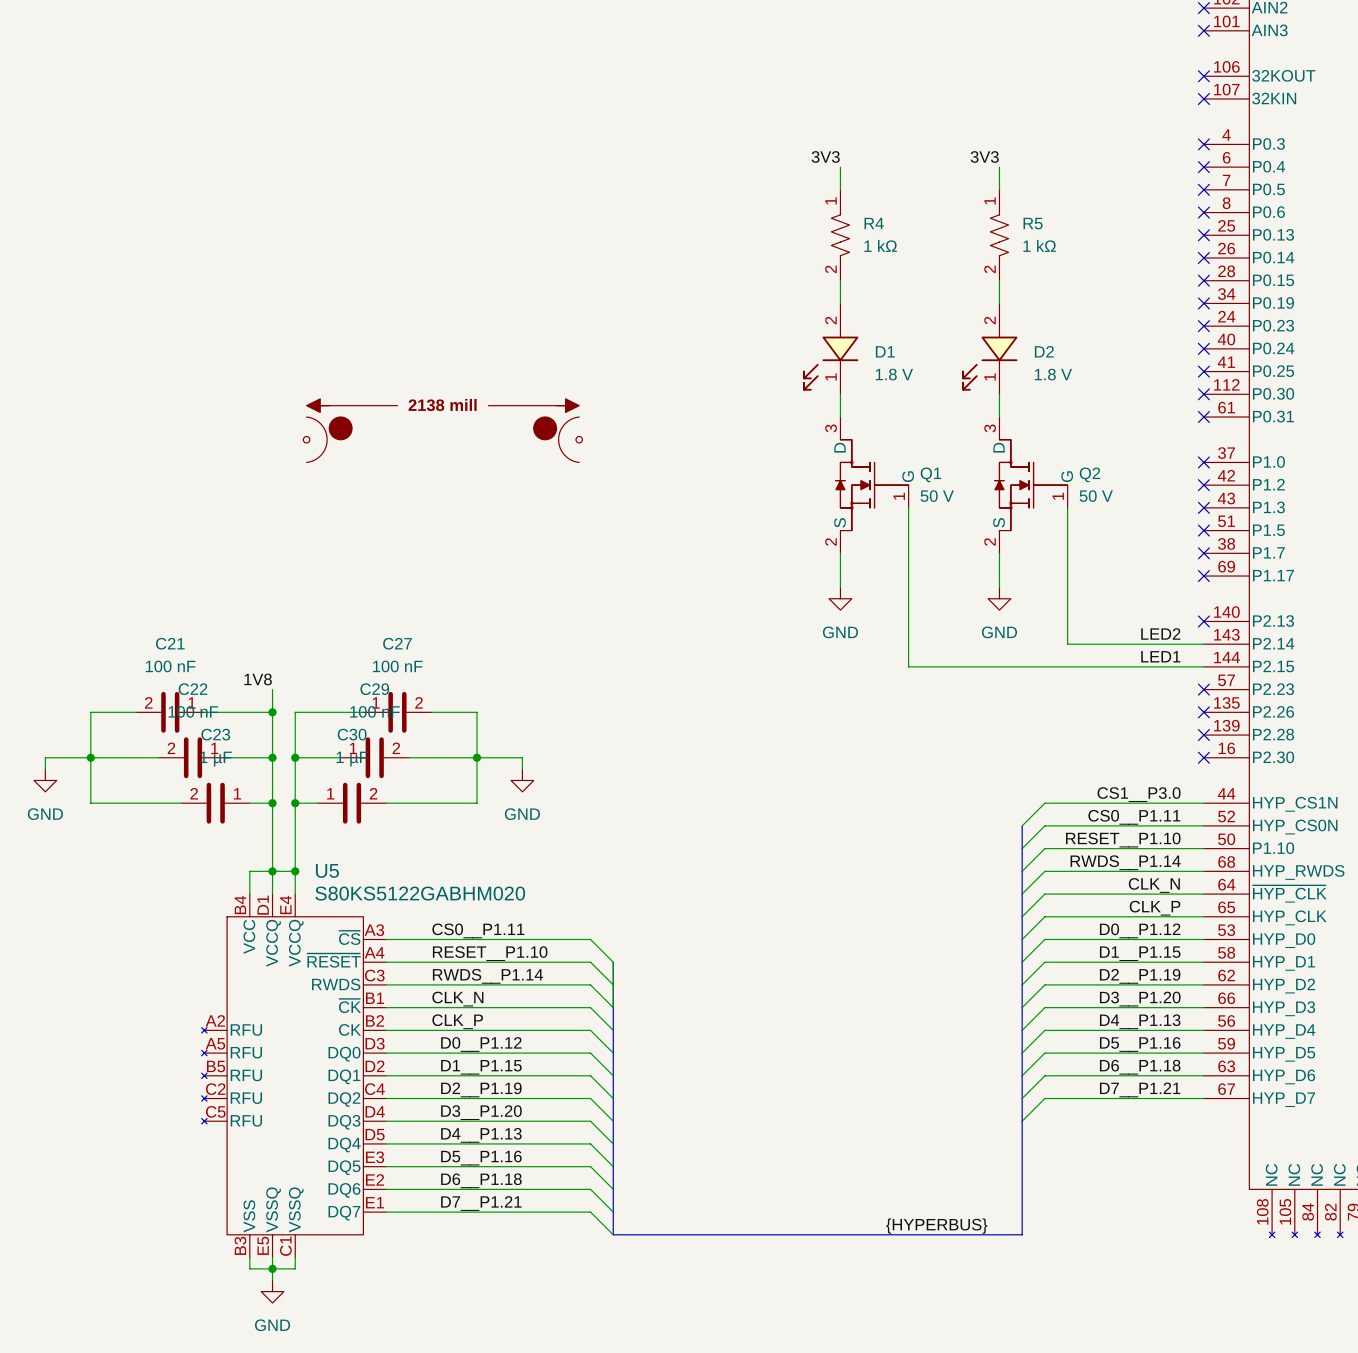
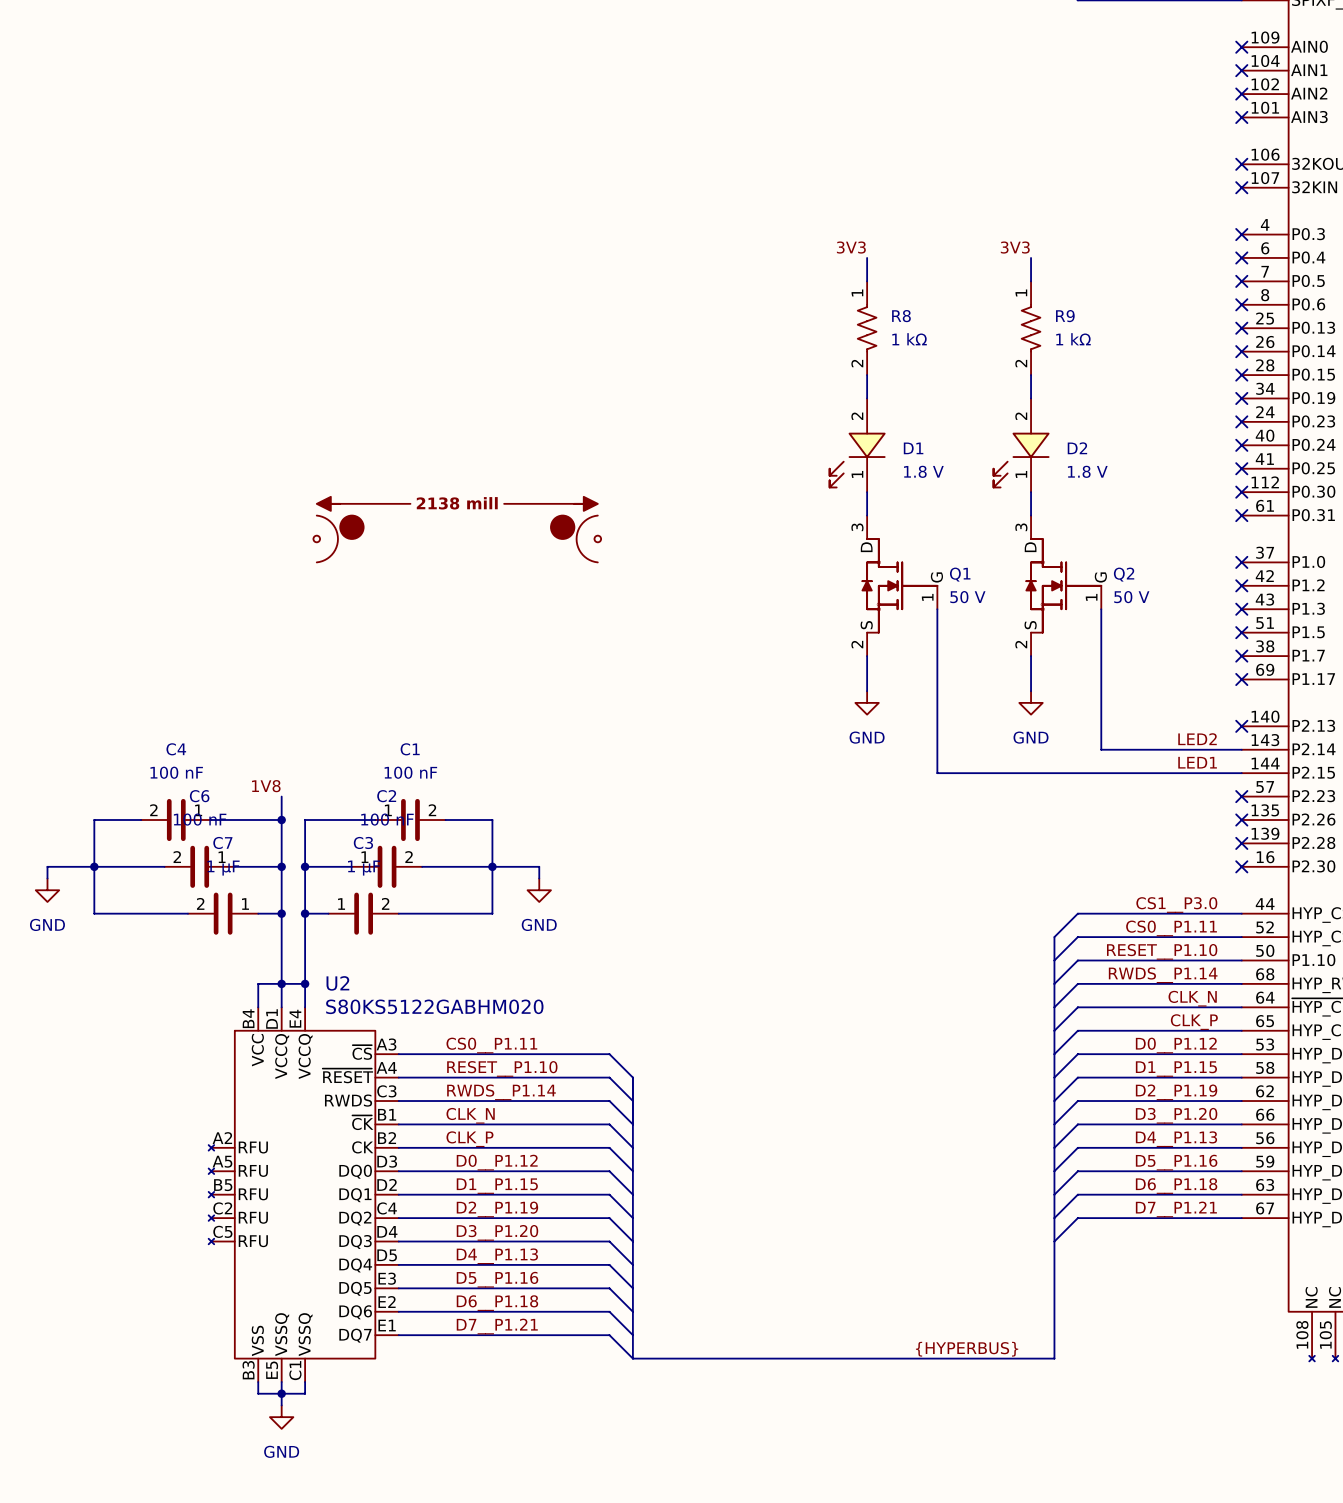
R4 name: R4 (874, 223) -> R8 (901, 316)
R5 name: R5 (1033, 223) -> R9 (1065, 316)
C21 name: C21 (170, 643) -> C4 (176, 749)
C27 name: C27 (397, 643) -> C1 (410, 749)
C22 name: C22 (193, 689) -> C6 (199, 796)
C29 name: C29 (374, 689) -> C2 (386, 796)
C23 name: C23 (215, 734) -> C7 (222, 842)
C30 name: C30 (352, 734) -> C3 (363, 842)
U5 name: U5 (327, 870) -> U2 (337, 983)

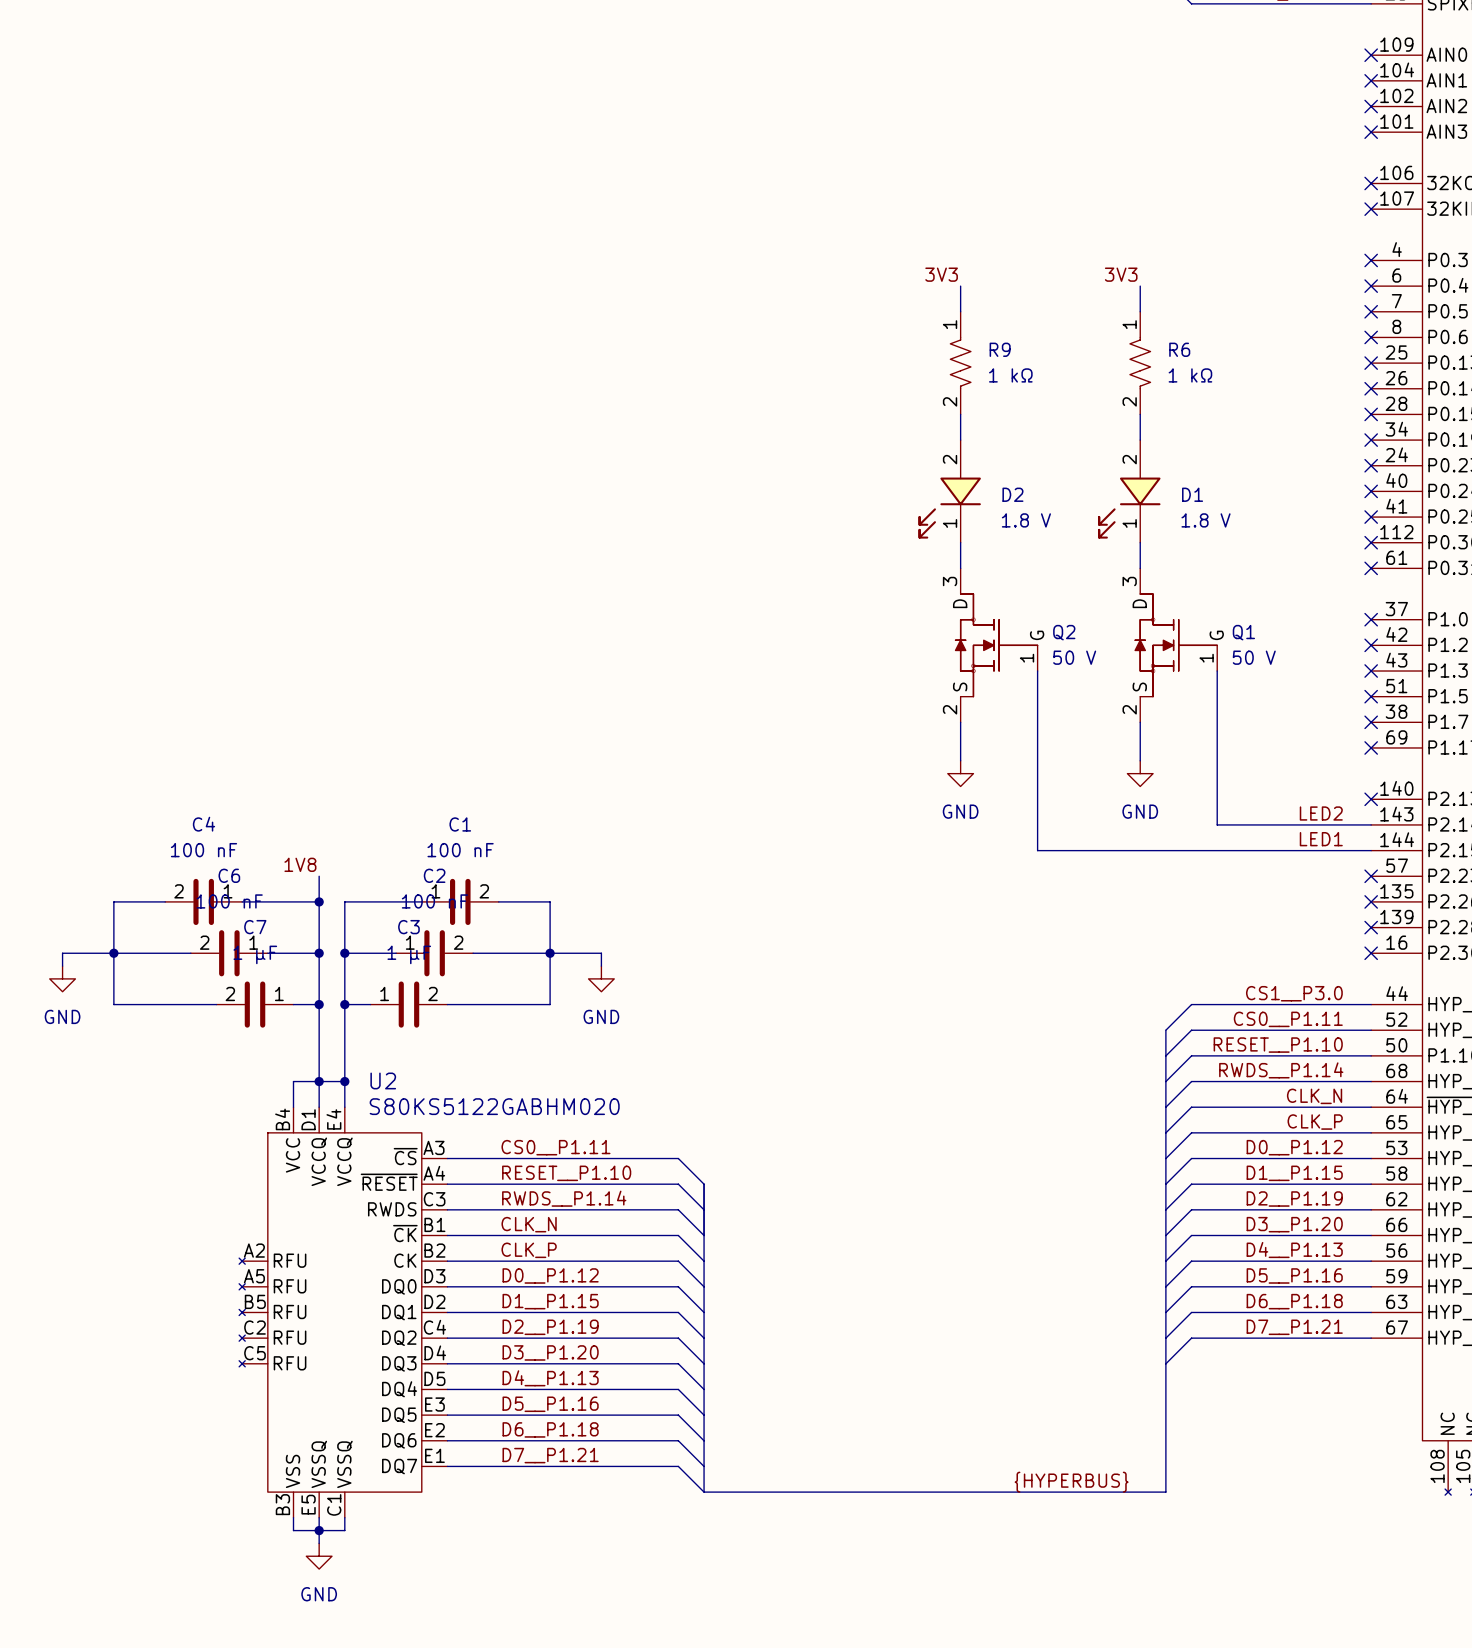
R8 name: R8 (901, 316) -> R9 (1000, 349)
R9 name: R9 (1065, 316) -> R6 (1179, 349)
D1 name: D1 (913, 448) -> D2 (1012, 494)
D2 name: D2 (1077, 448) -> D1 (1192, 494)
part: (457, 529) -> none
Q1 name: Q1 (960, 574) -> Q2 (1064, 632)
Q2 name: Q2 (1124, 574) -> Q1 (1243, 632)

